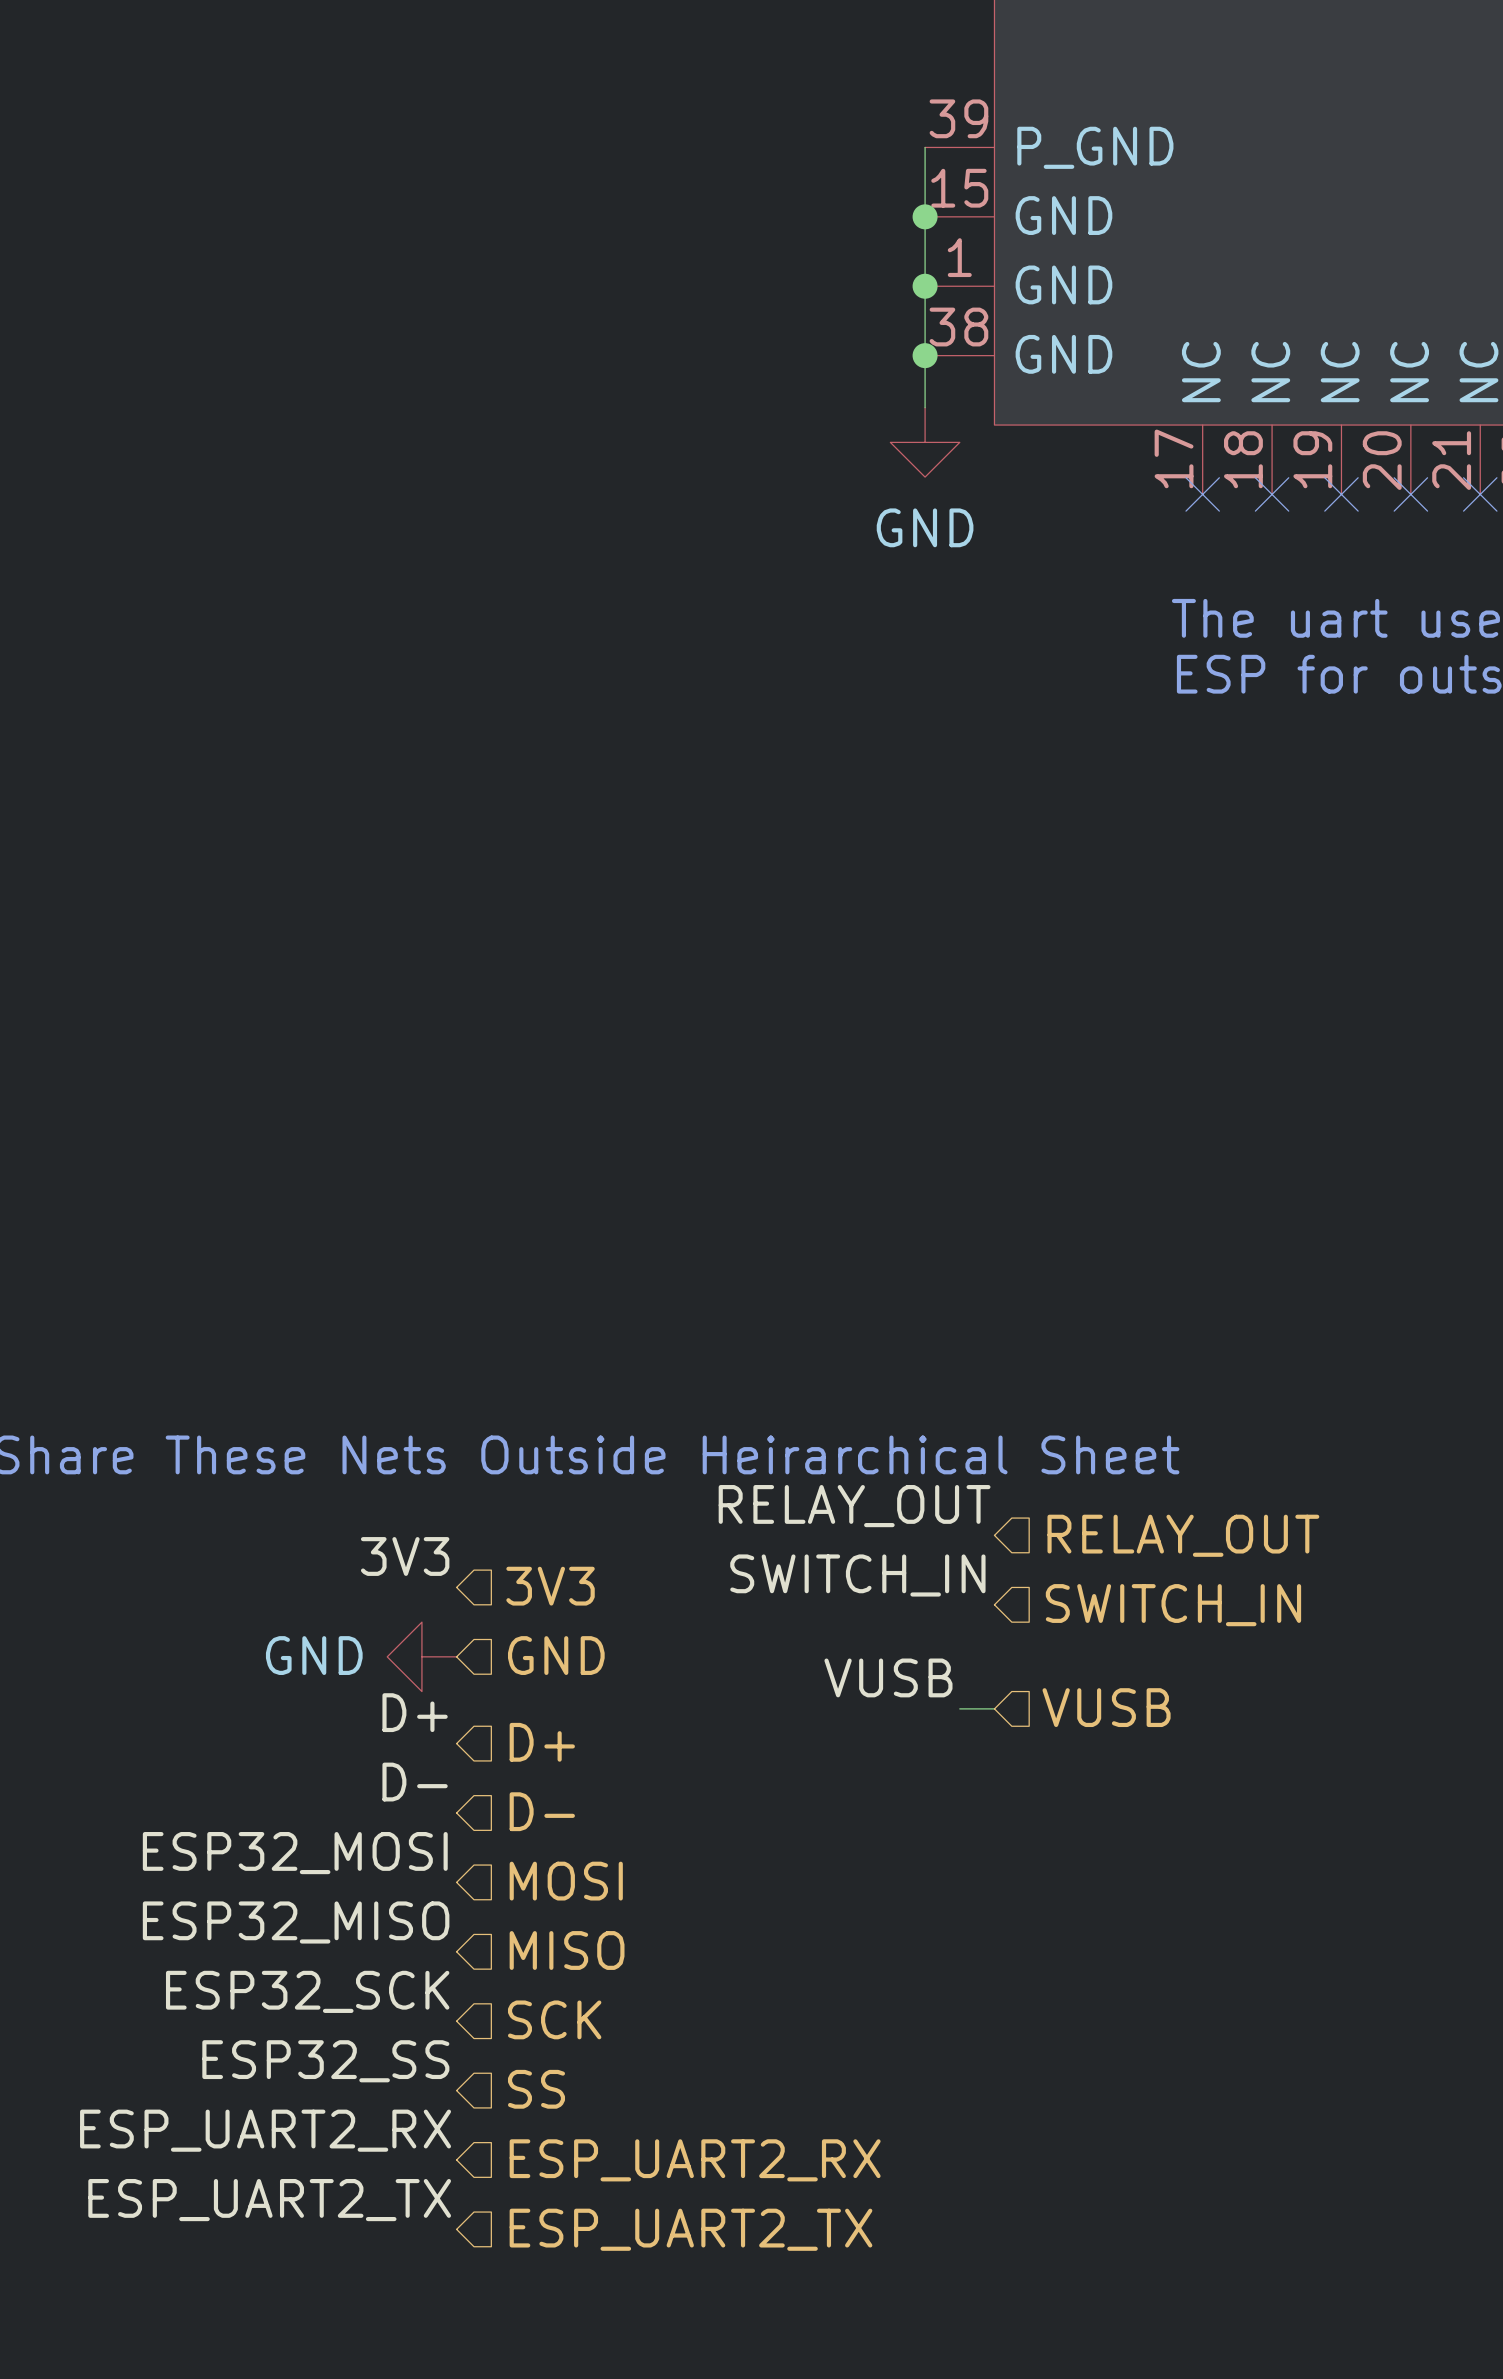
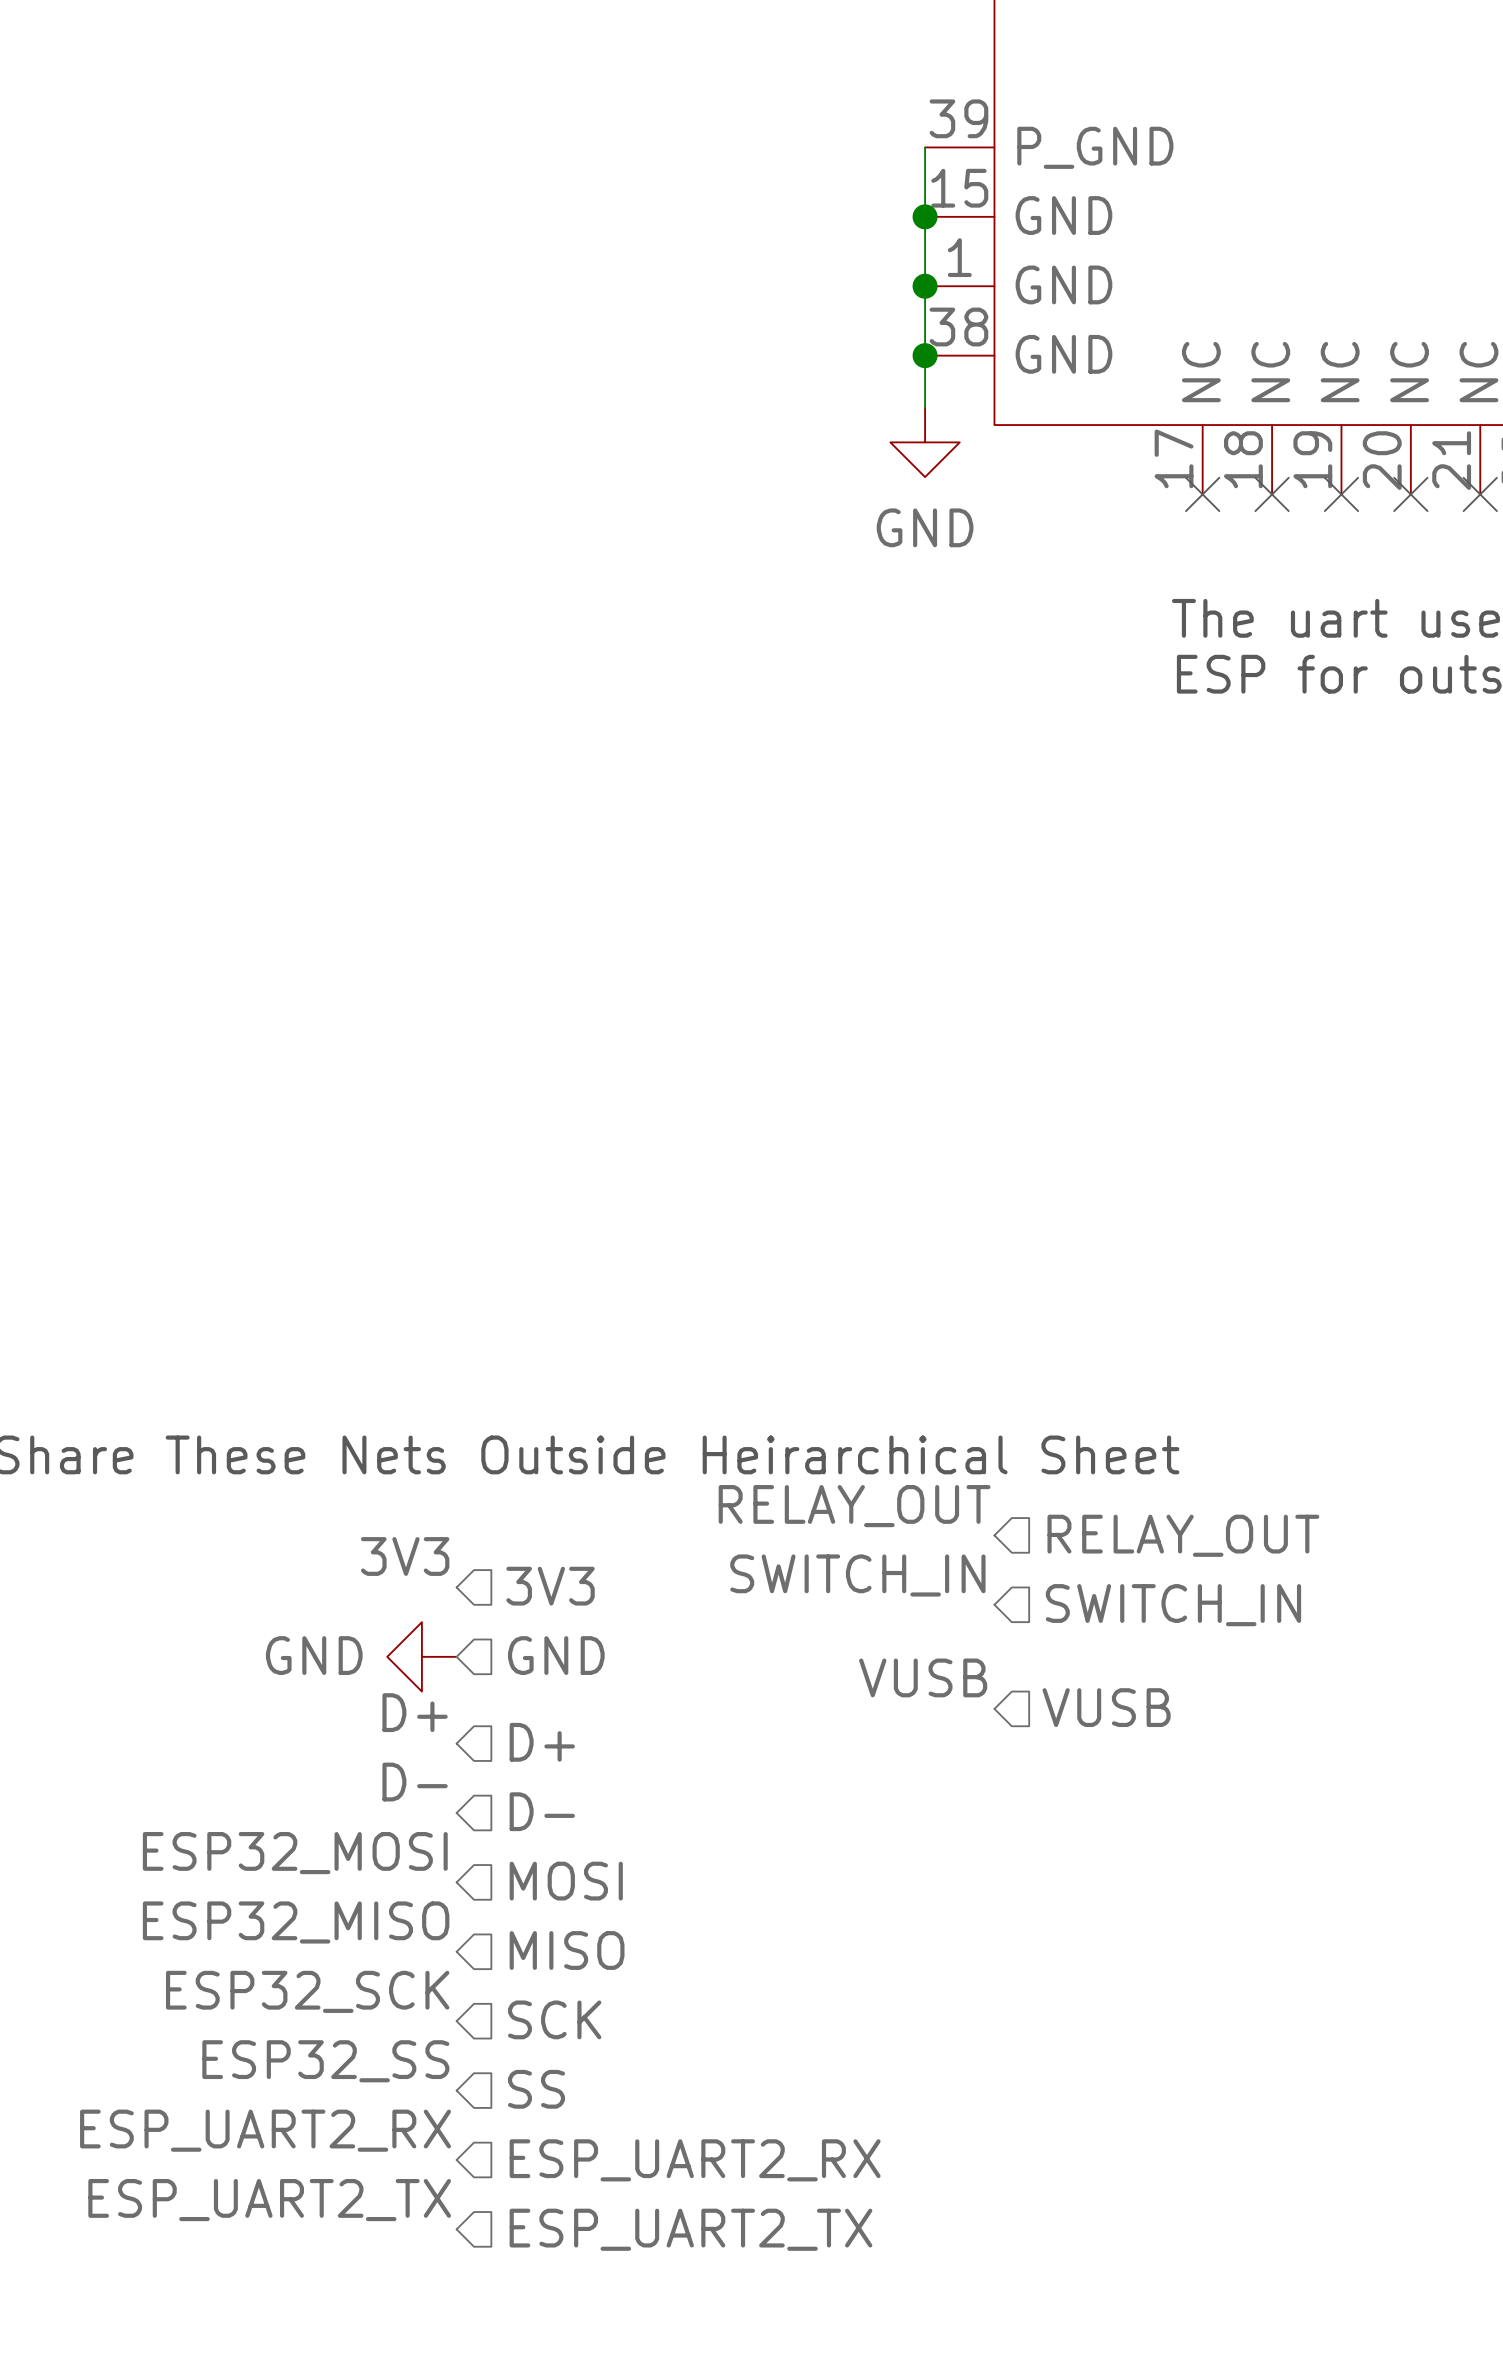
label position: VUSB (888, 1677) -> VUSB (923, 1677)
wire: (959, 1708) (994, 1708) -> none

